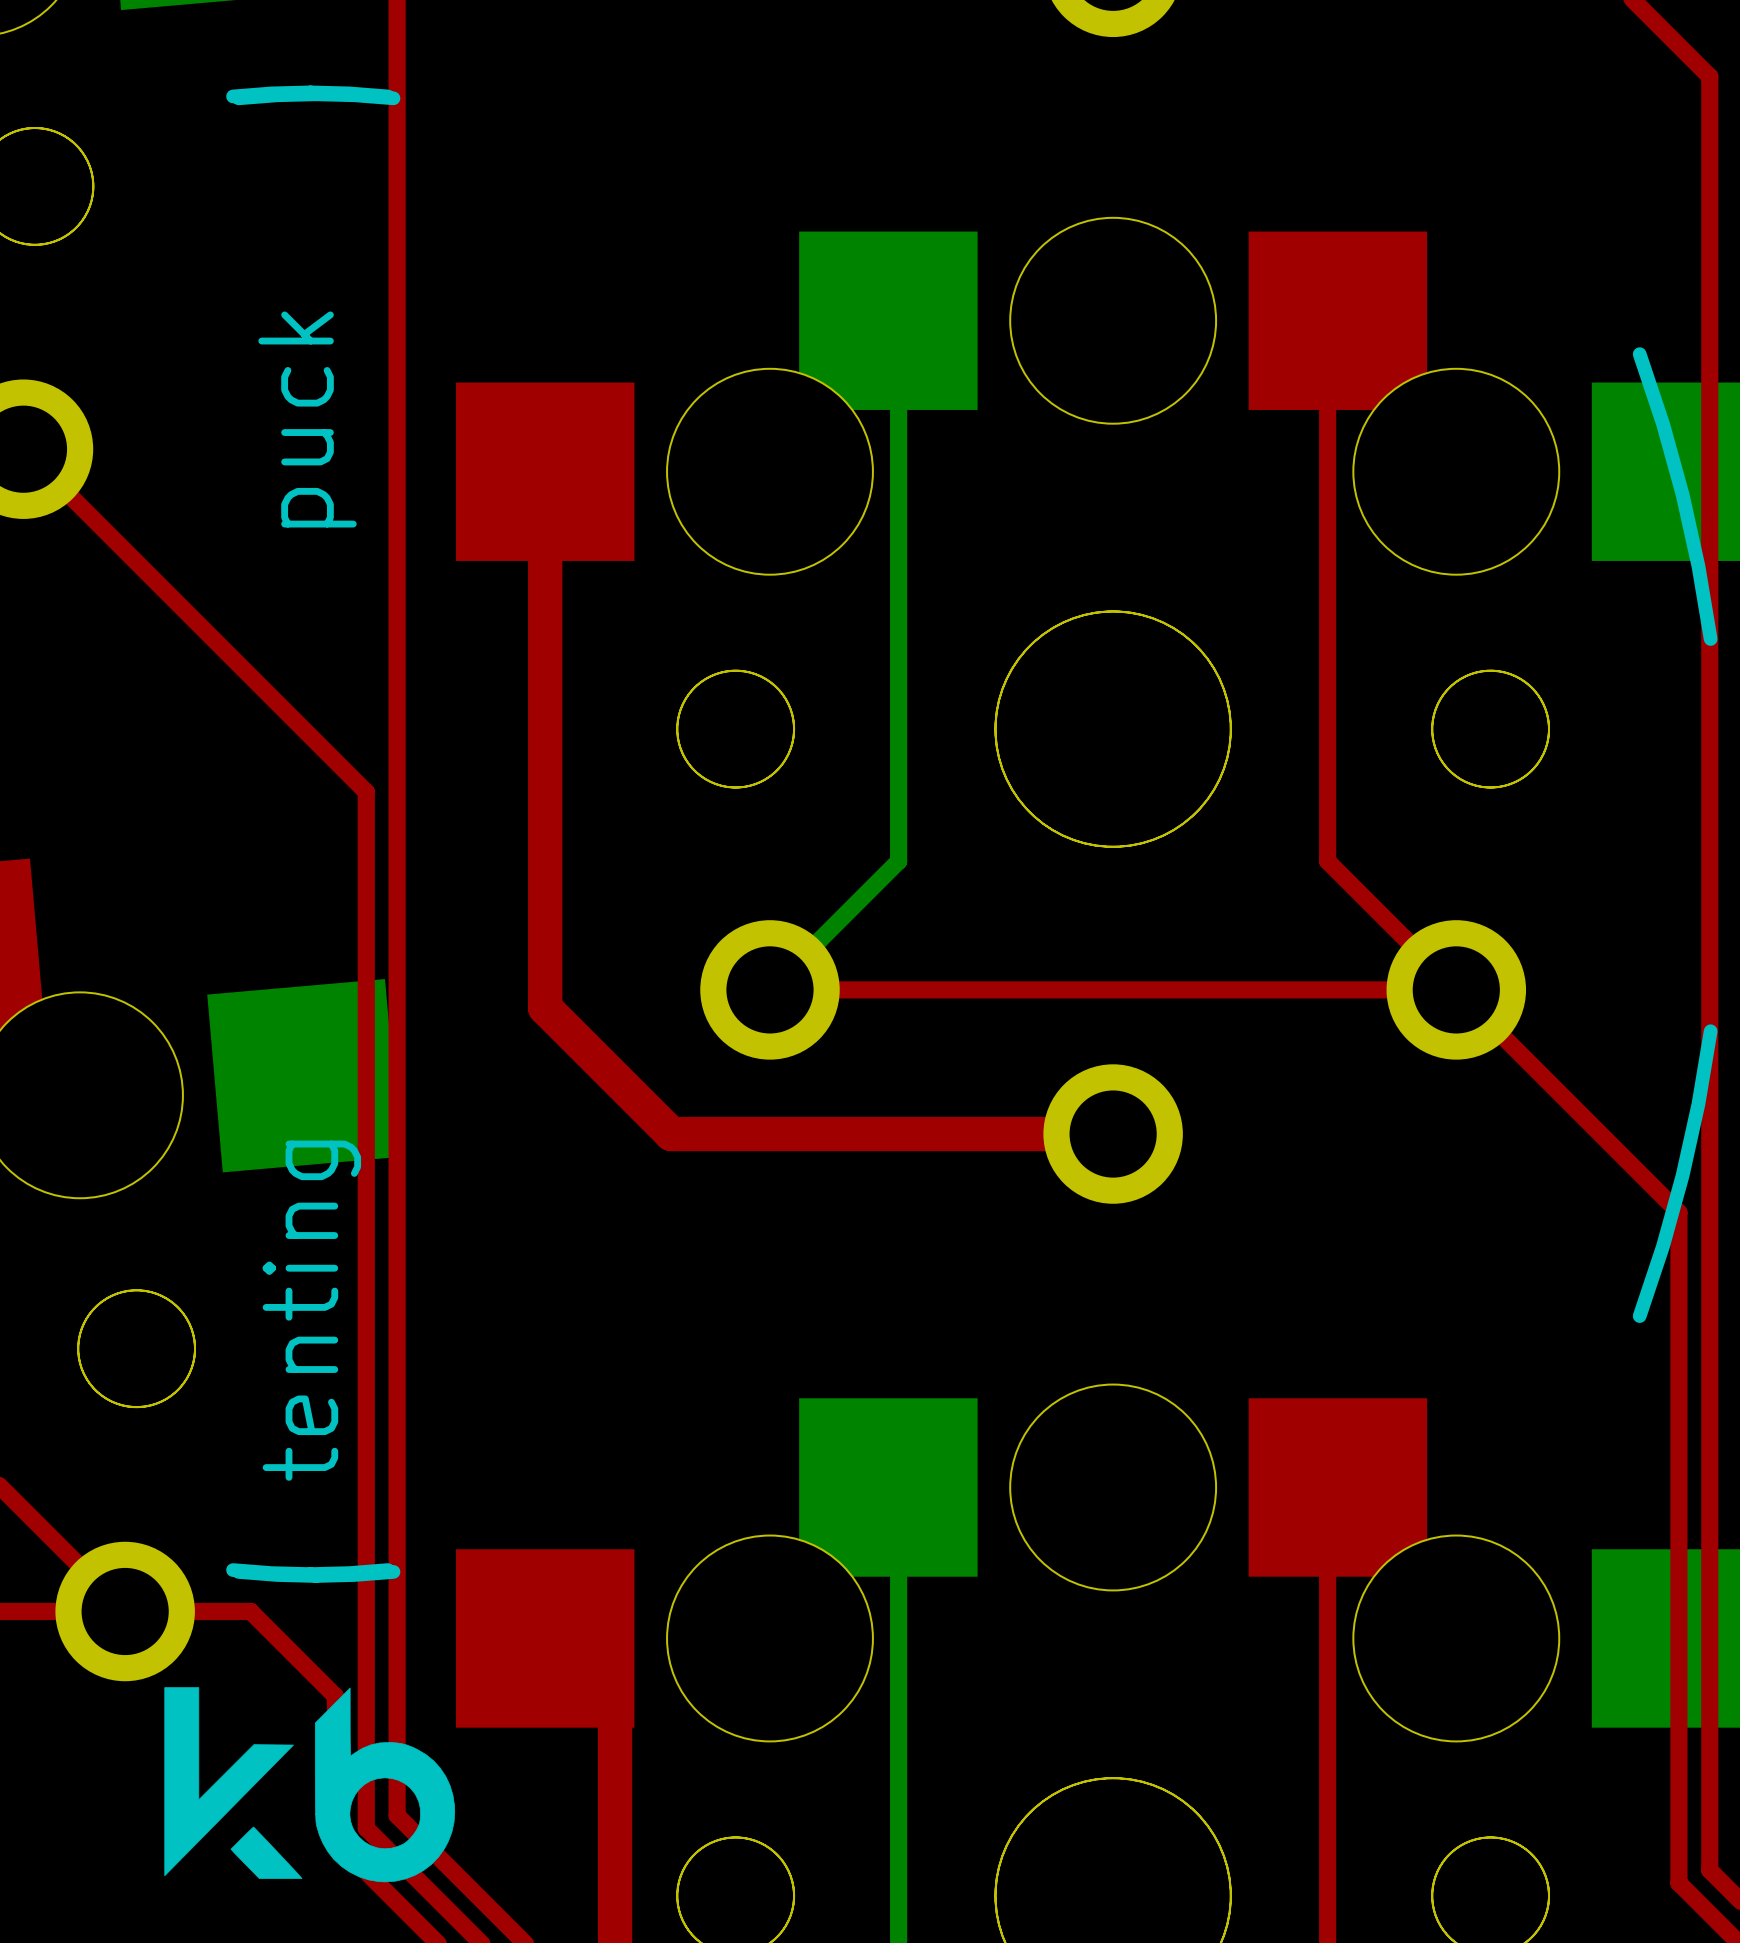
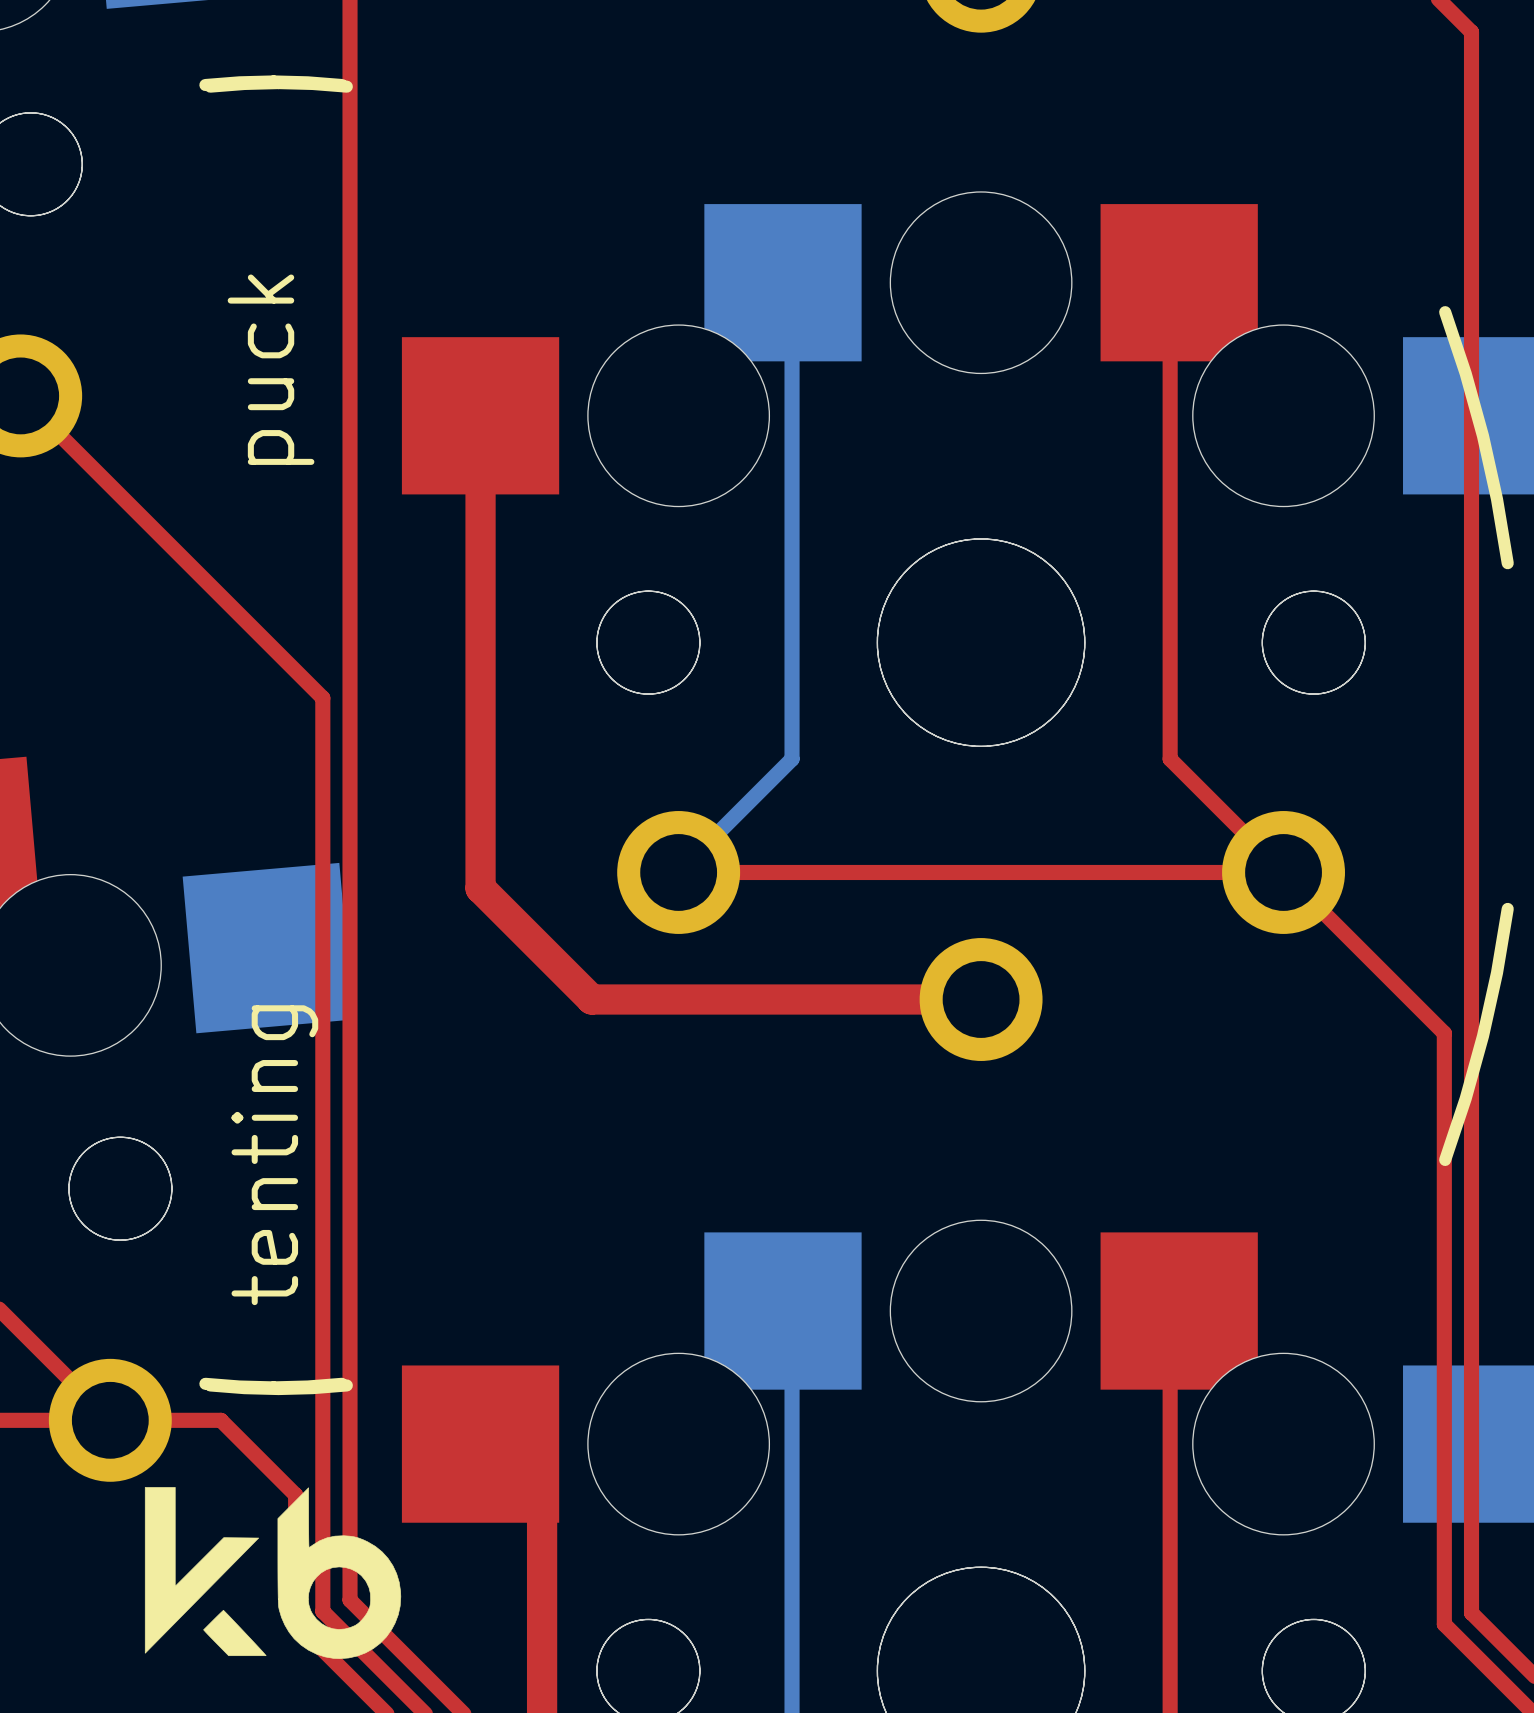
top track: (1669, 36) (1709, 76) (1709, 1870) -> (1471, 32) (1471, 1613) (1506, 1648)
top track: (1638, 1172) (1678, 1212) (1678, 1883) -> (1444, 1033) (1444, 1624) (1479, 1659)

